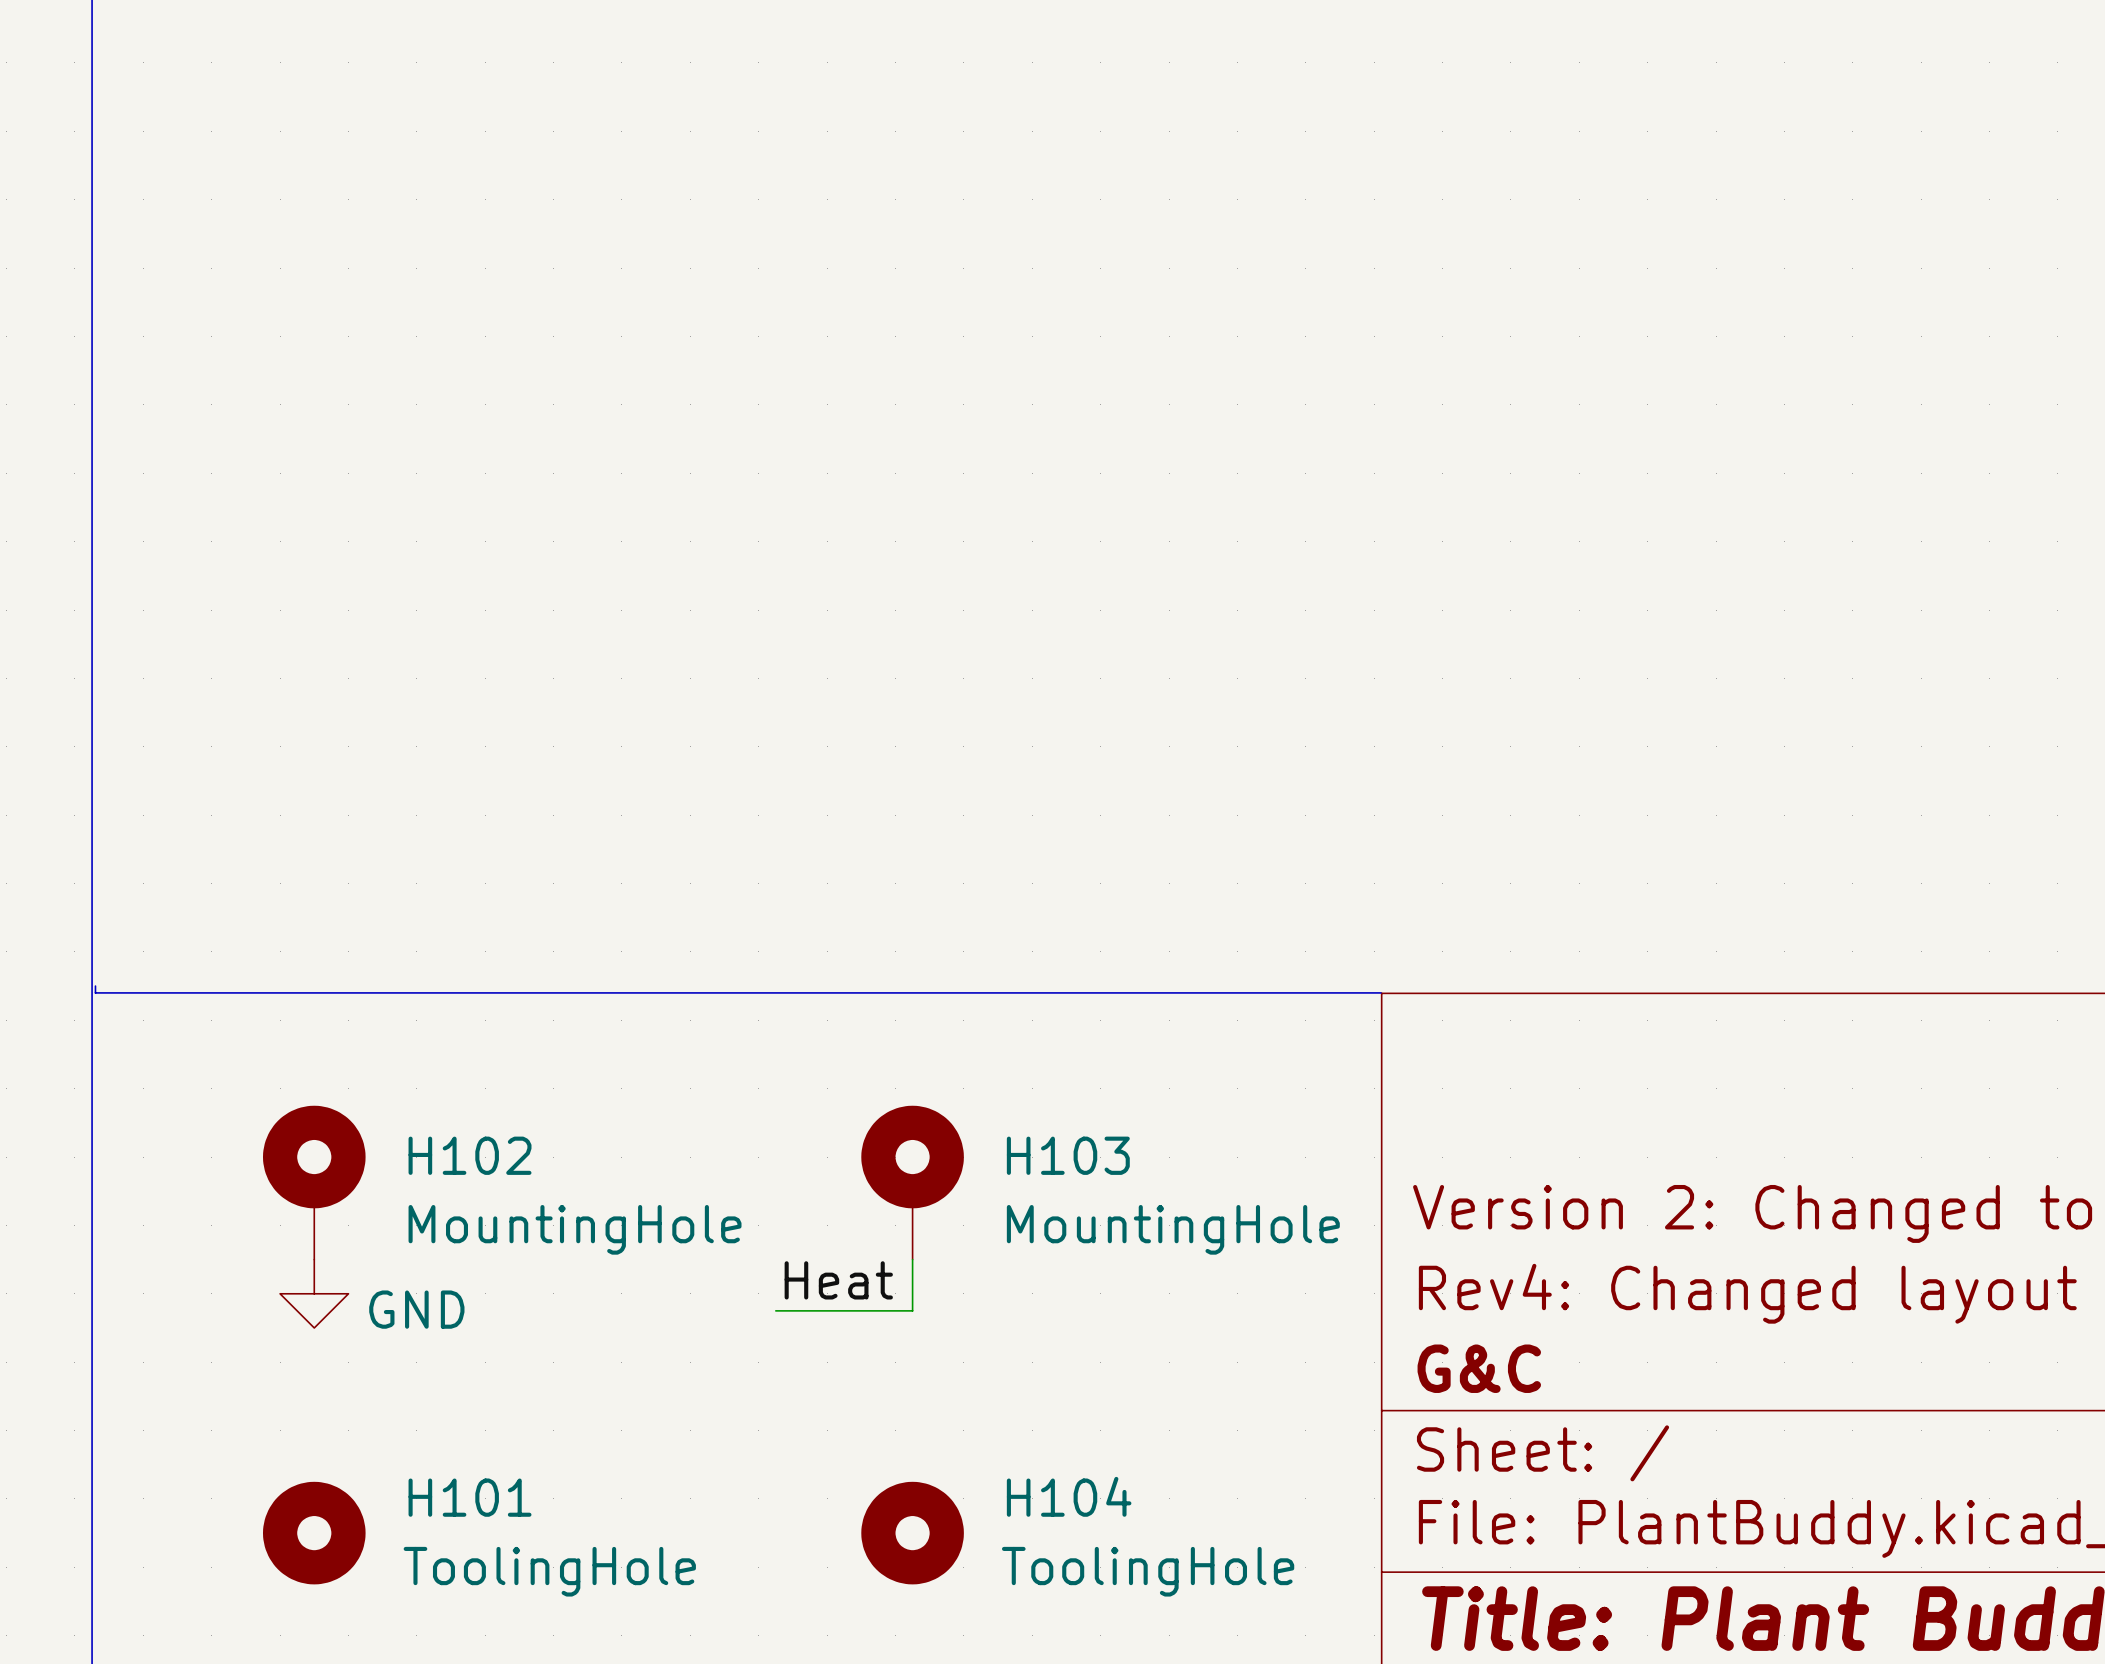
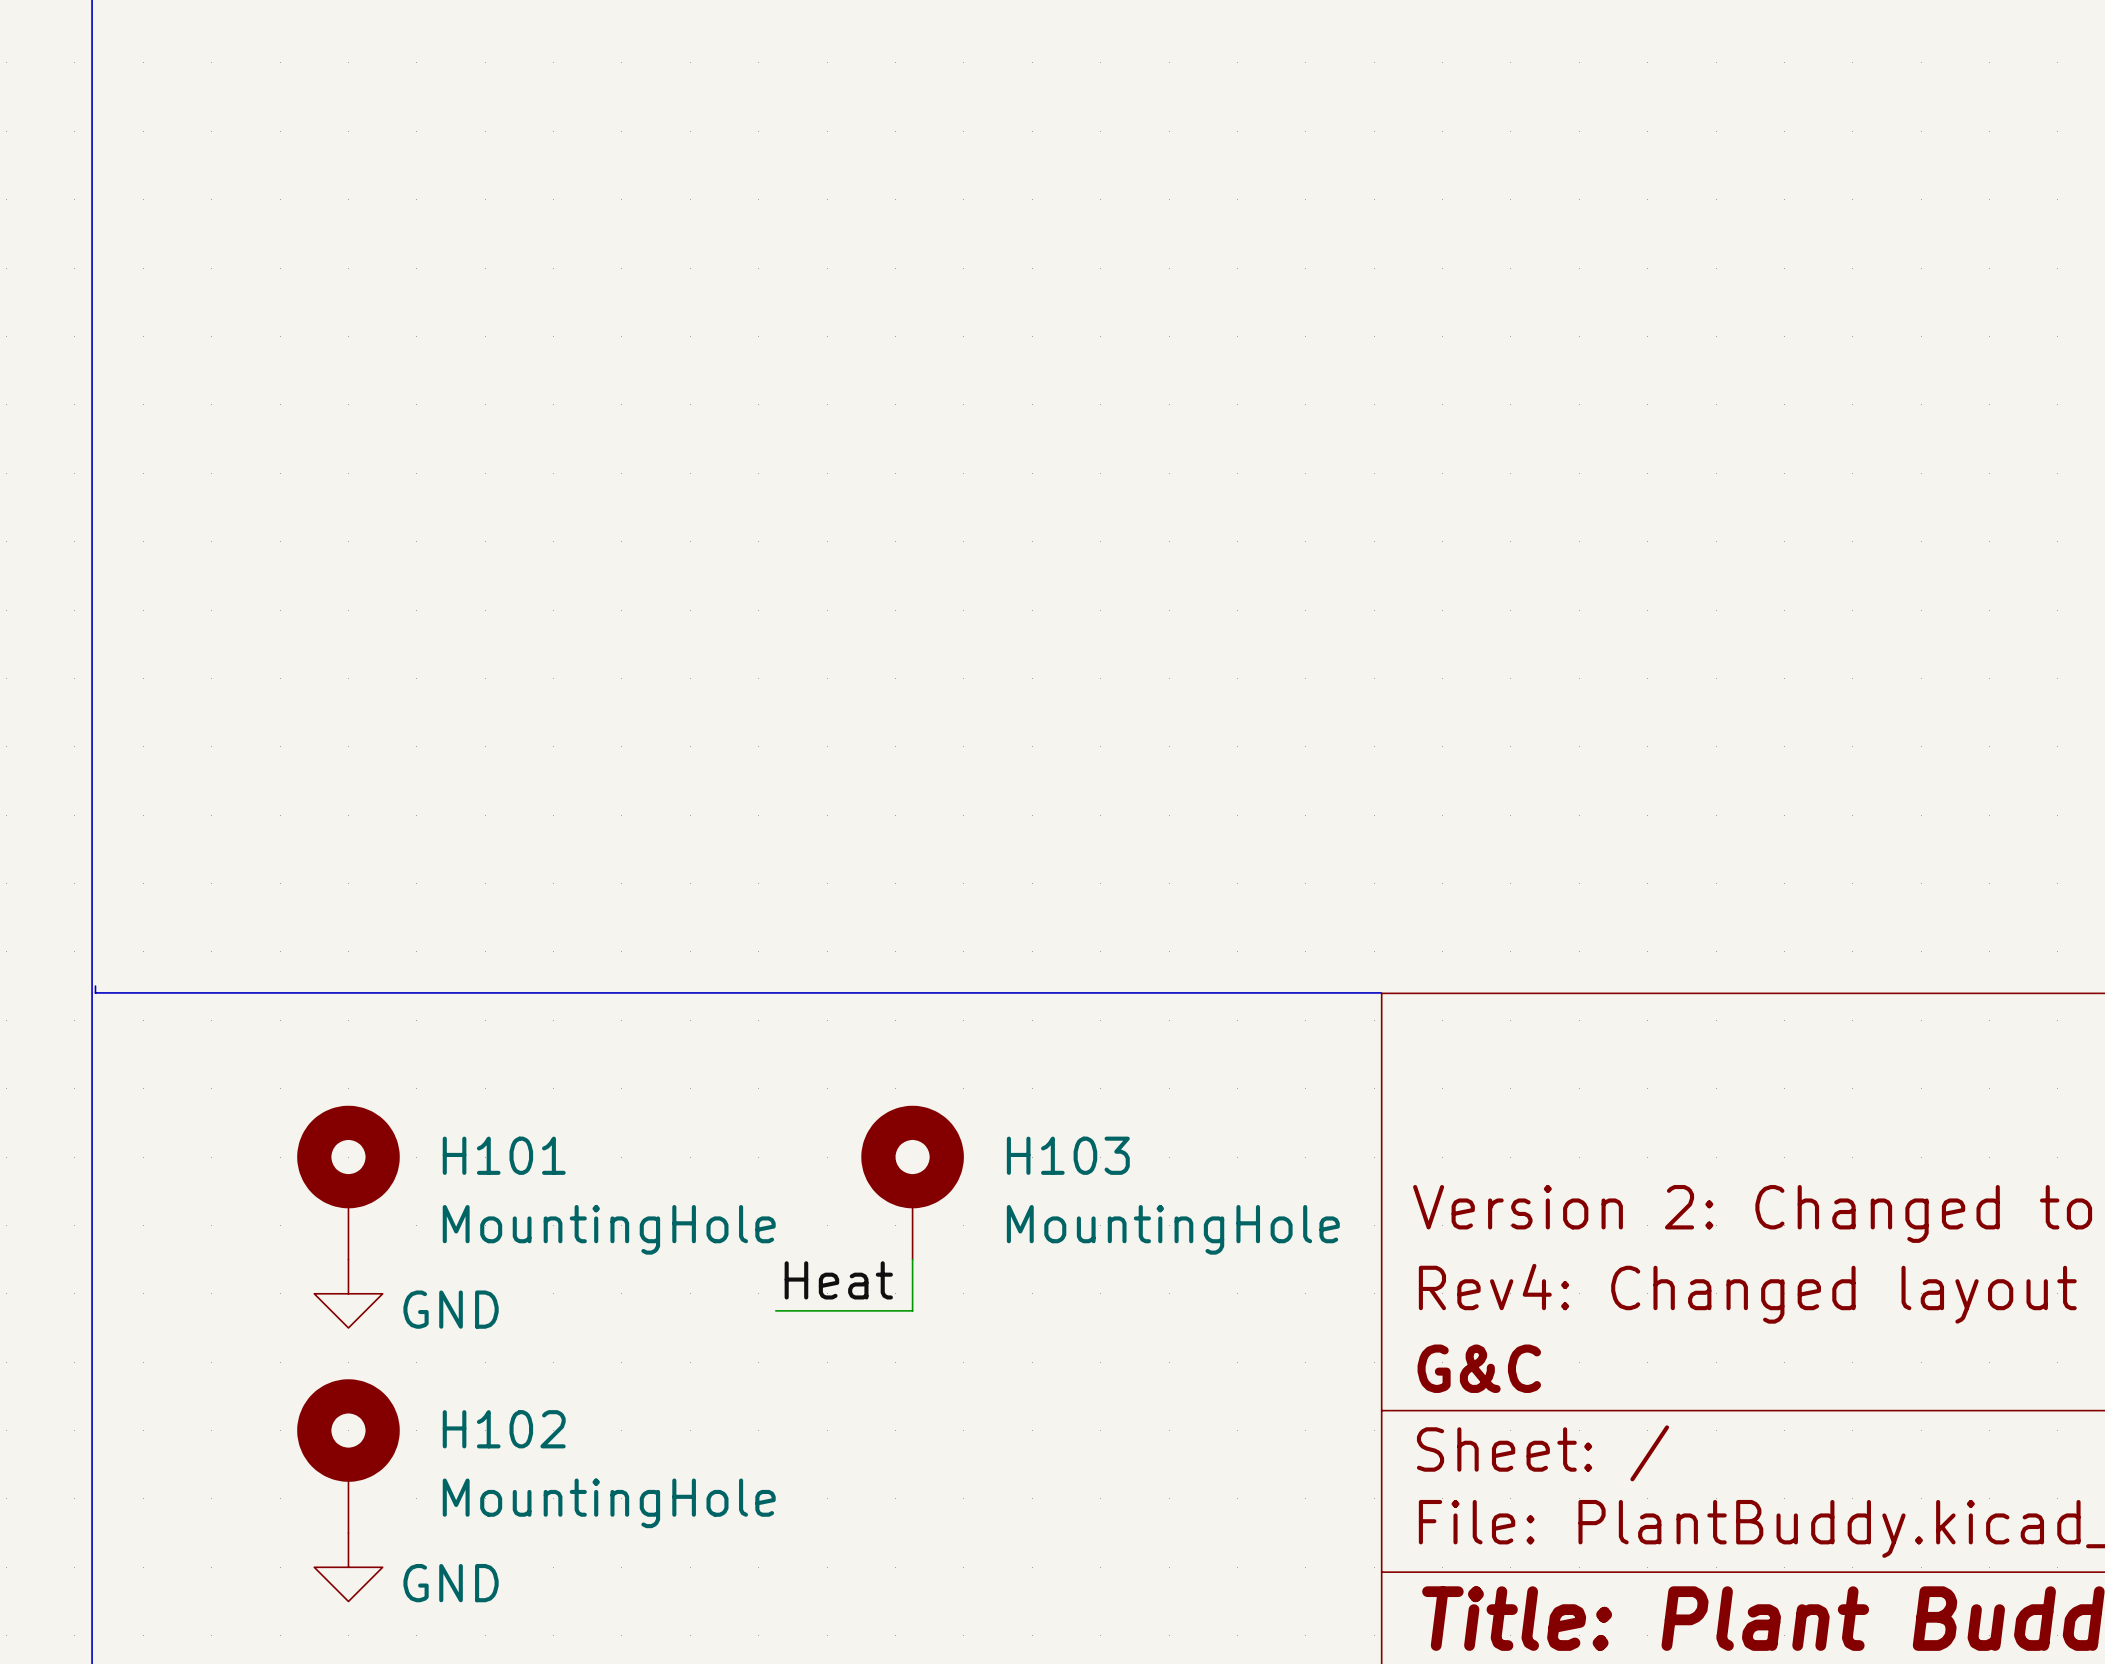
H102 position: (314, 1182) -> (348, 1456)
power symbol position: GND (314, 1293) -> GND (348, 1293)
H101 symbol: [263, 1481, 366, 1585] -> [297, 1105, 400, 1260]
H104: ToolingHole (912, 1533) -> none
power symbol: none -> GND (348, 1567)
H101 value: ToolingHole (549, 1571) -> MountingHole (609, 1229)

